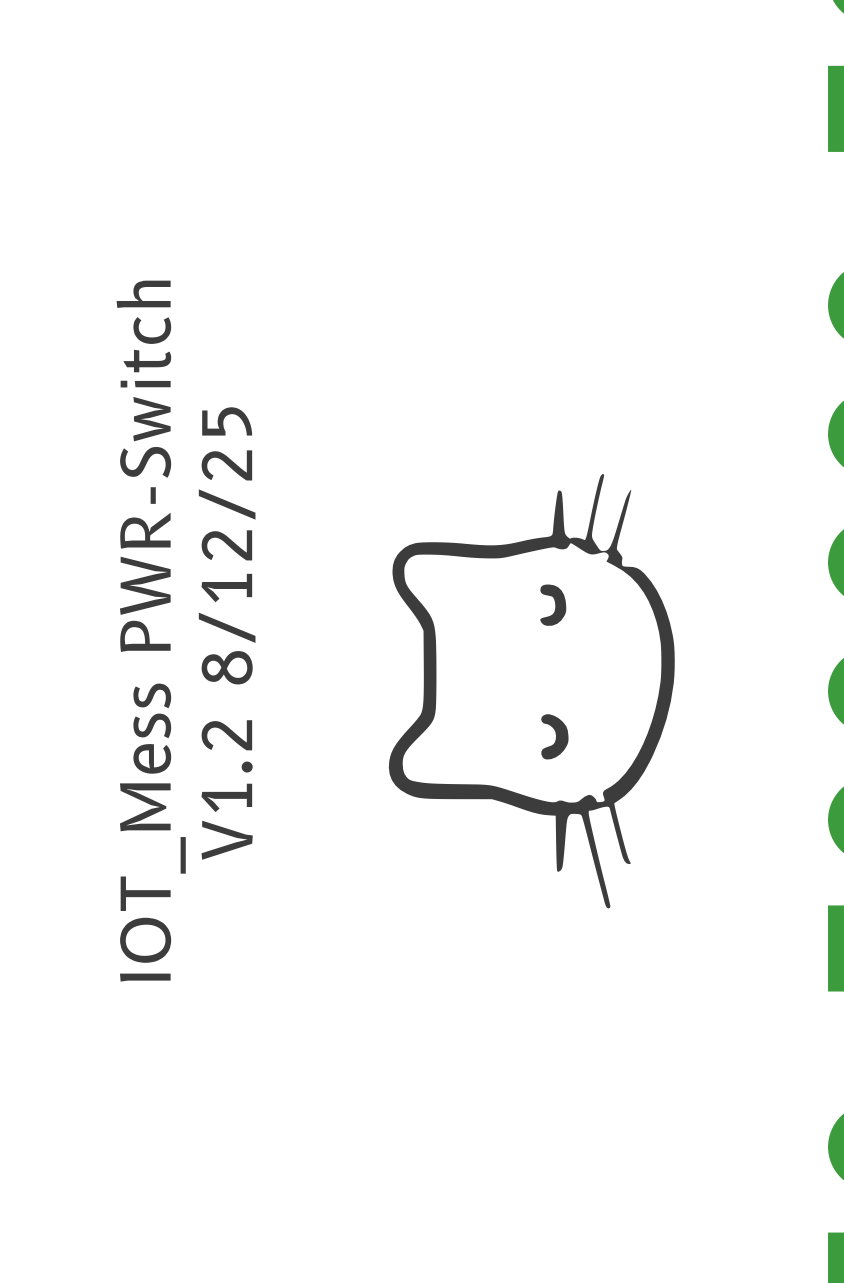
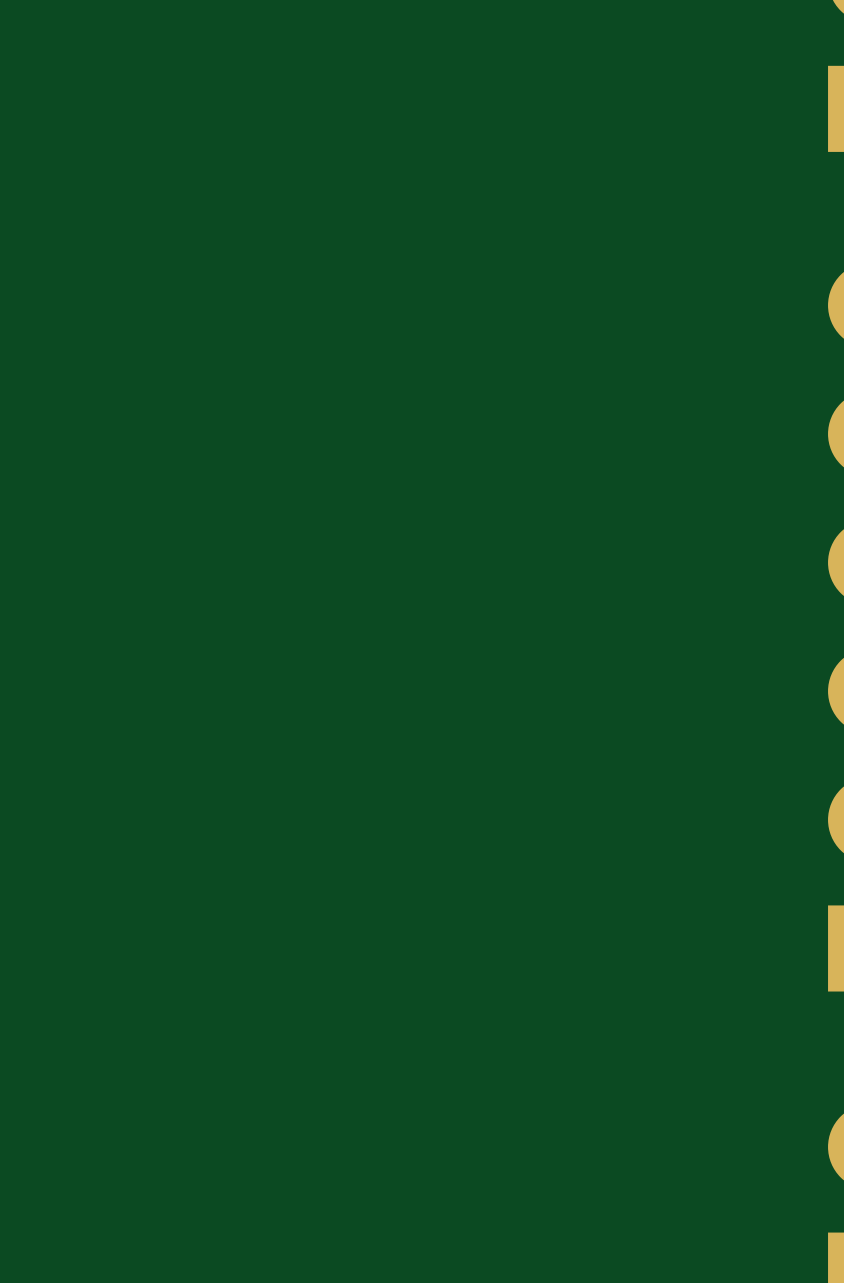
drawing: [388, 473, 675, 909] -> none
text: IOT_Mess PWR-Switch (151, 631) -> none
text: V1.2 8/12/25 (227, 633) -> none

